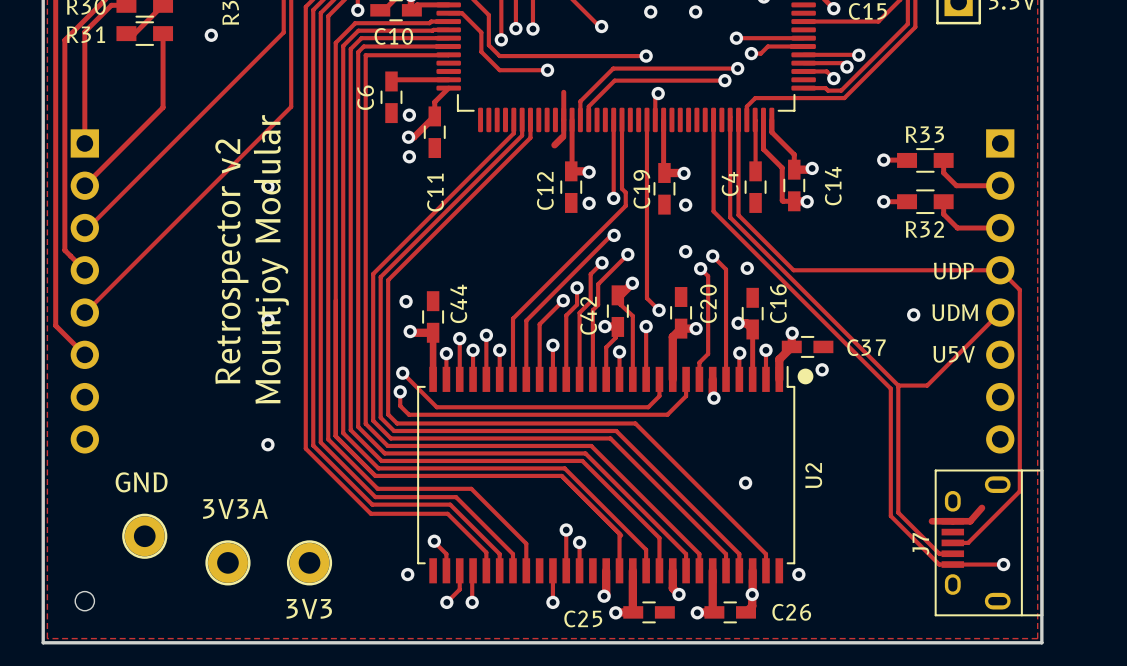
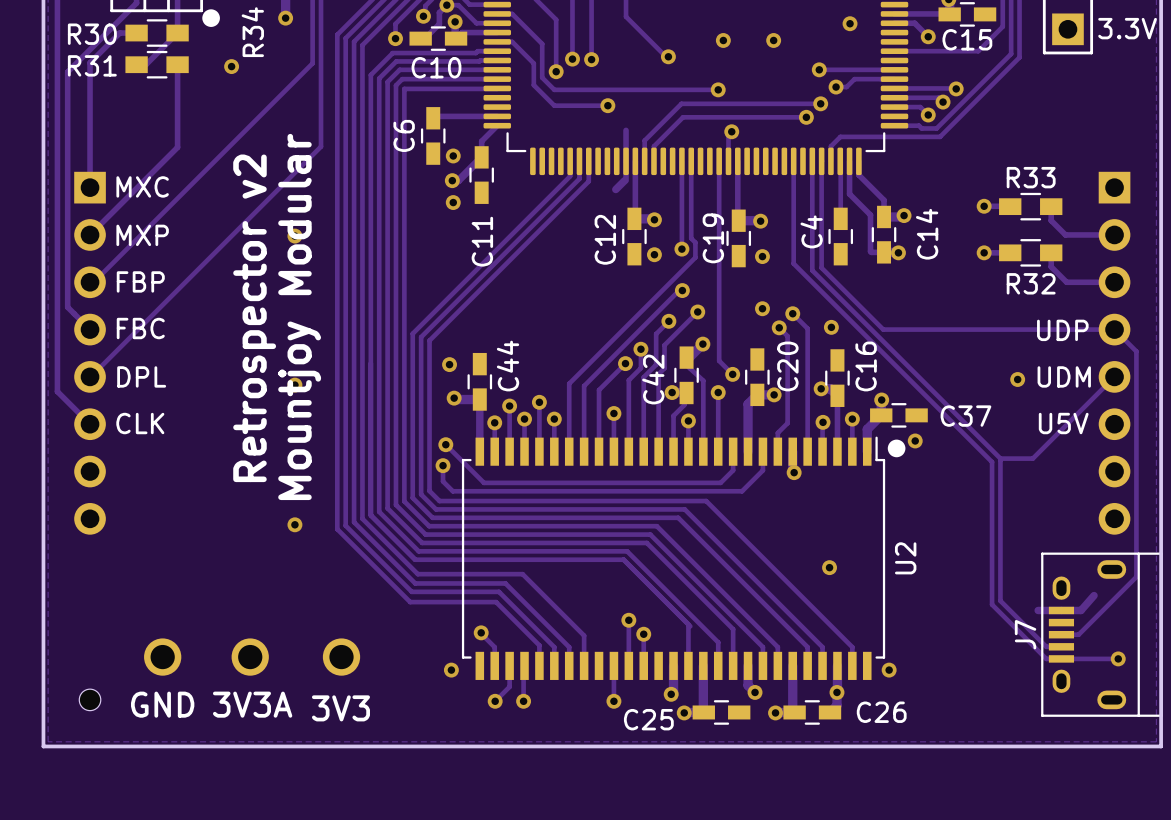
text: none -> MXC (142, 186)
text: none -> MXP (142, 235)
text: none -> FBP (140, 281)
text: none -> FBC (140, 328)
text: none -> DPL (141, 376)
text: none -> CLK (140, 423)
text position: GND (141, 482) -> GND (162, 704)
text position: 3V3A (235, 509) -> 3V3A (252, 704)
part: (144, 536) -> none
part footprint: [205, 540, 251, 586] -> [231, 638, 269, 676]
part footprint: [286, 540, 333, 586] -> [322, 638, 361, 676]
part: none -> (162, 657)

